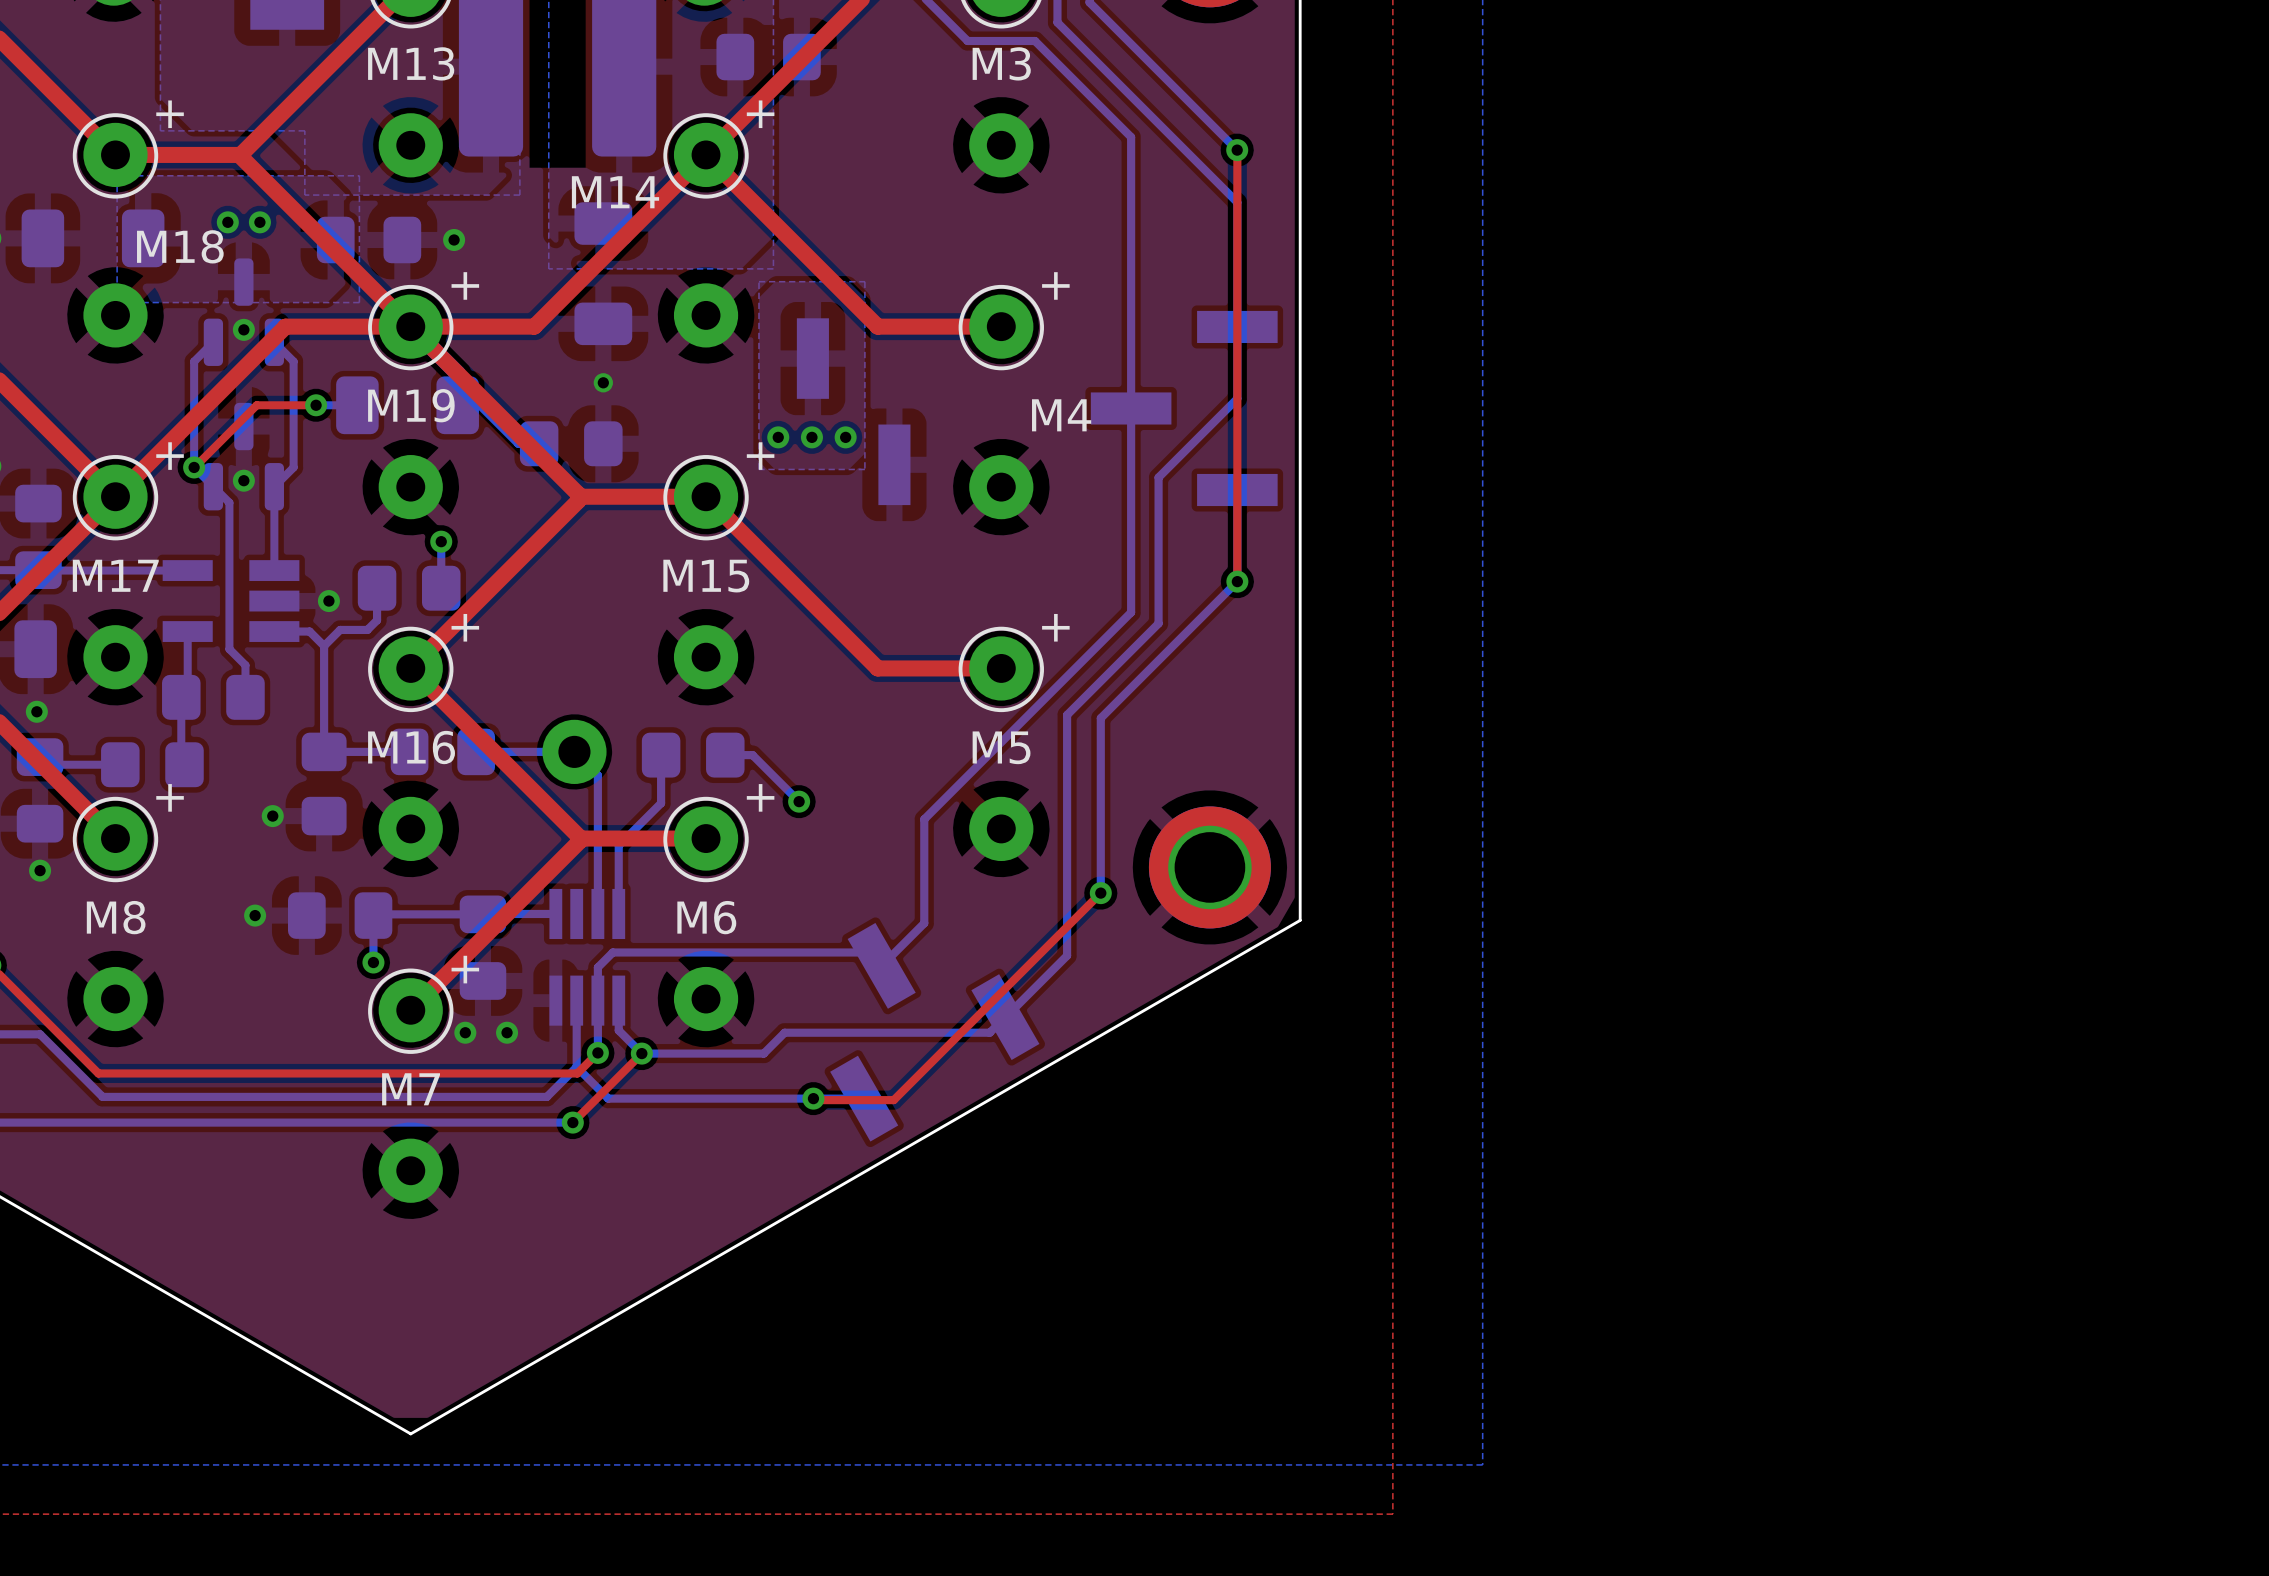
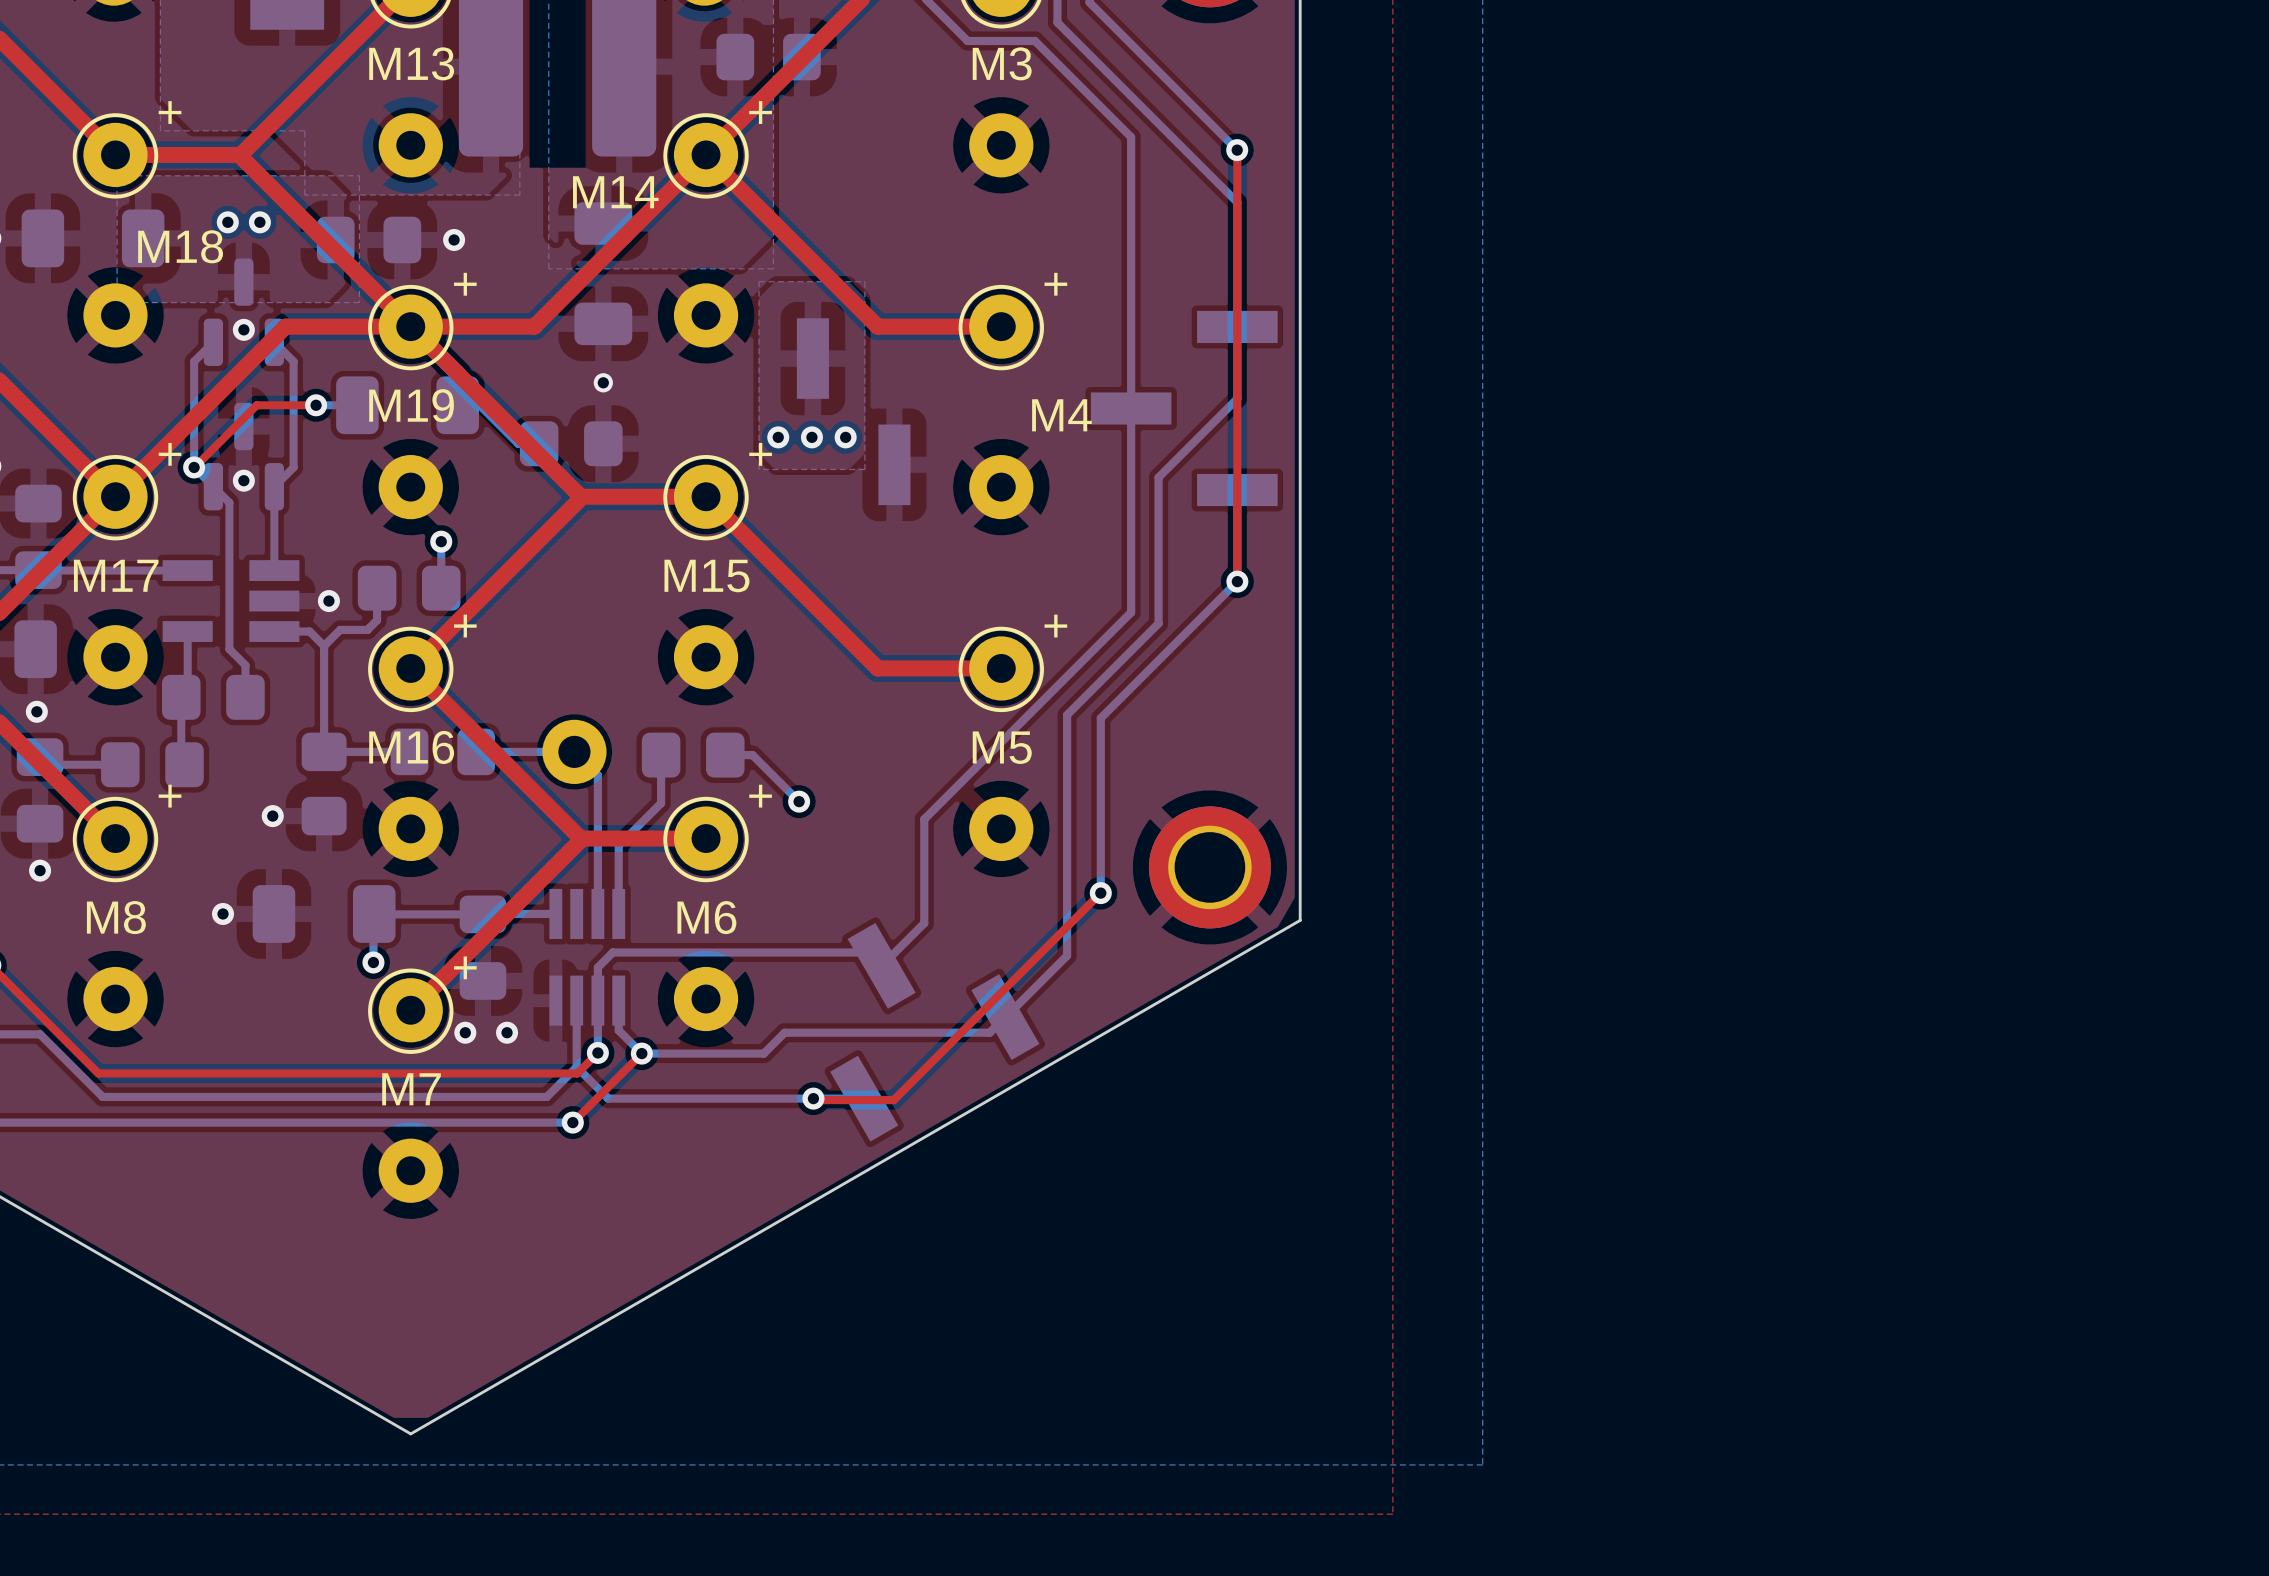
part footprint: [288, 892, 393, 939] -> [252, 885, 396, 943]
via position: (255, 915) -> (223, 913)

